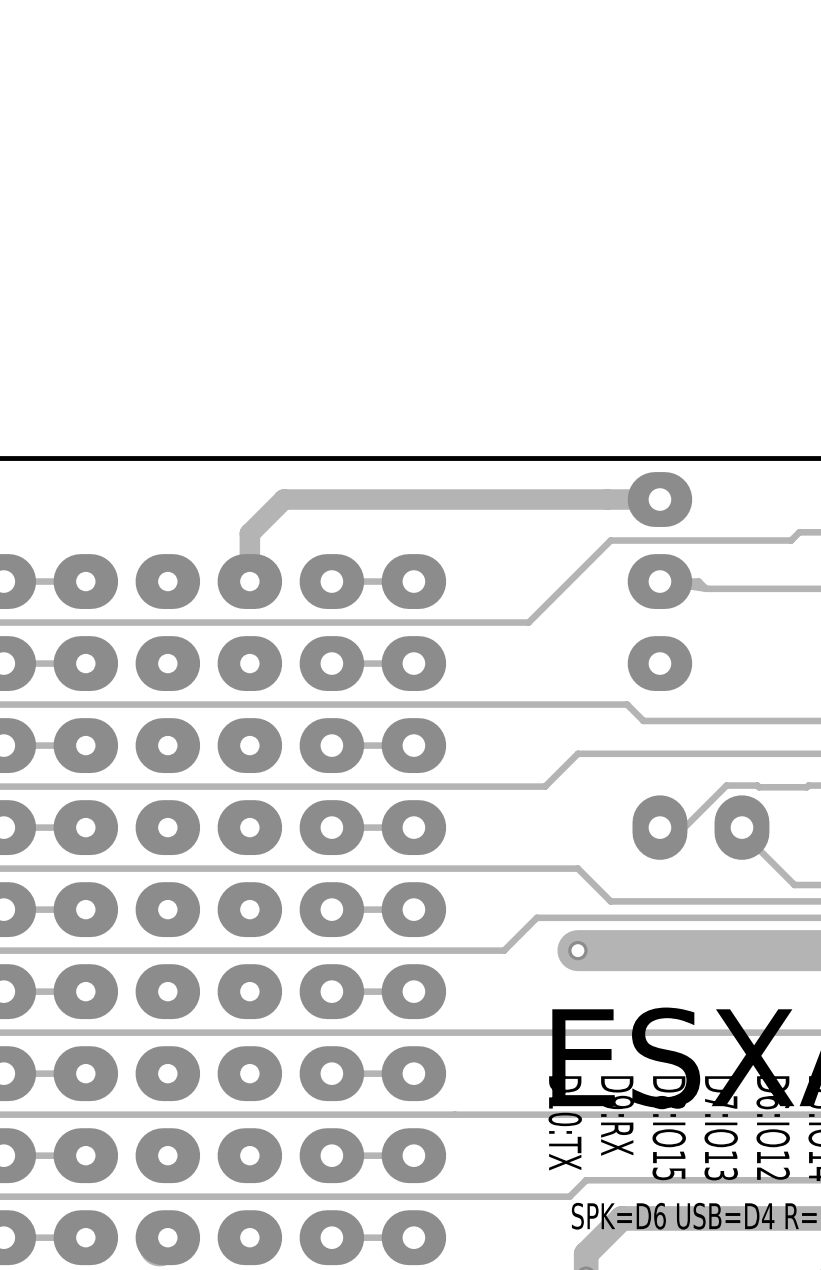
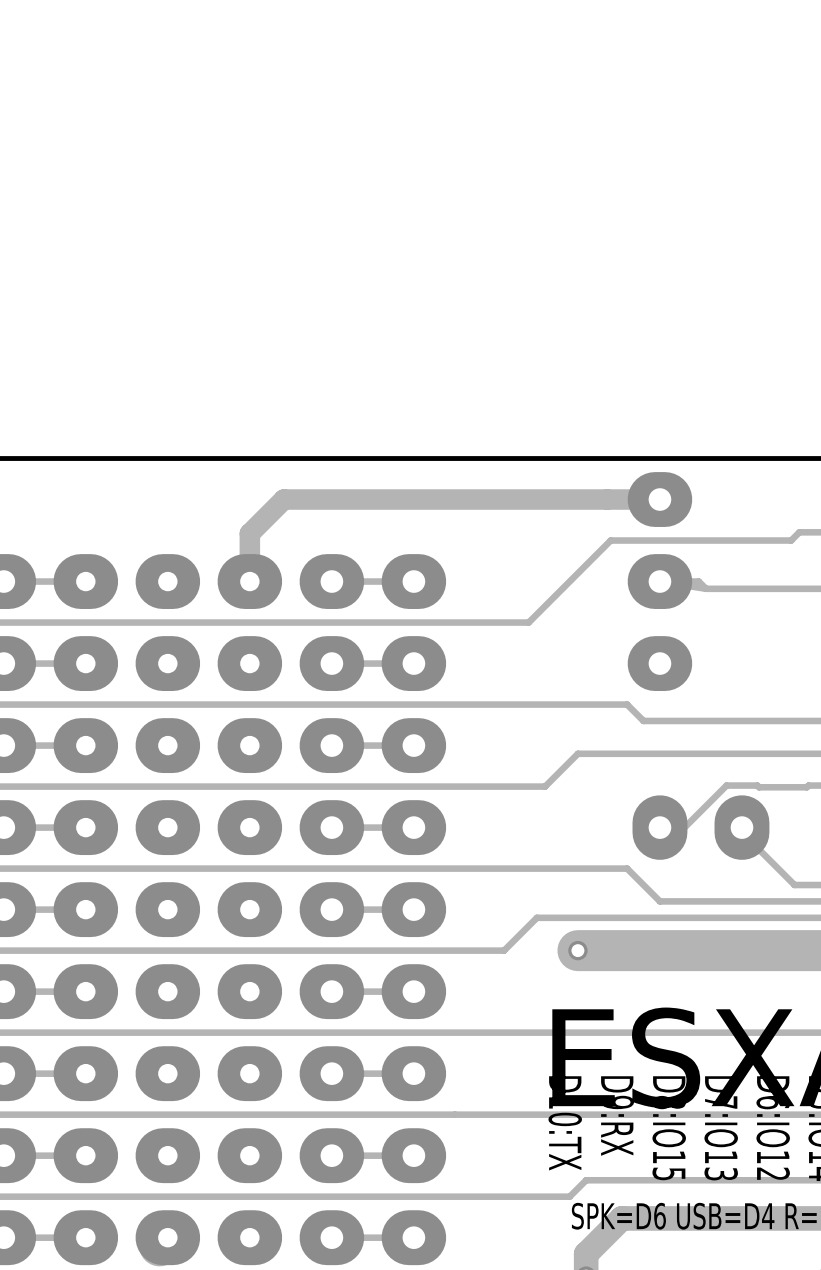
track: (577, 868) (610, 901) (659, 901) -> (577, 868) (627, 868) (659, 901)

